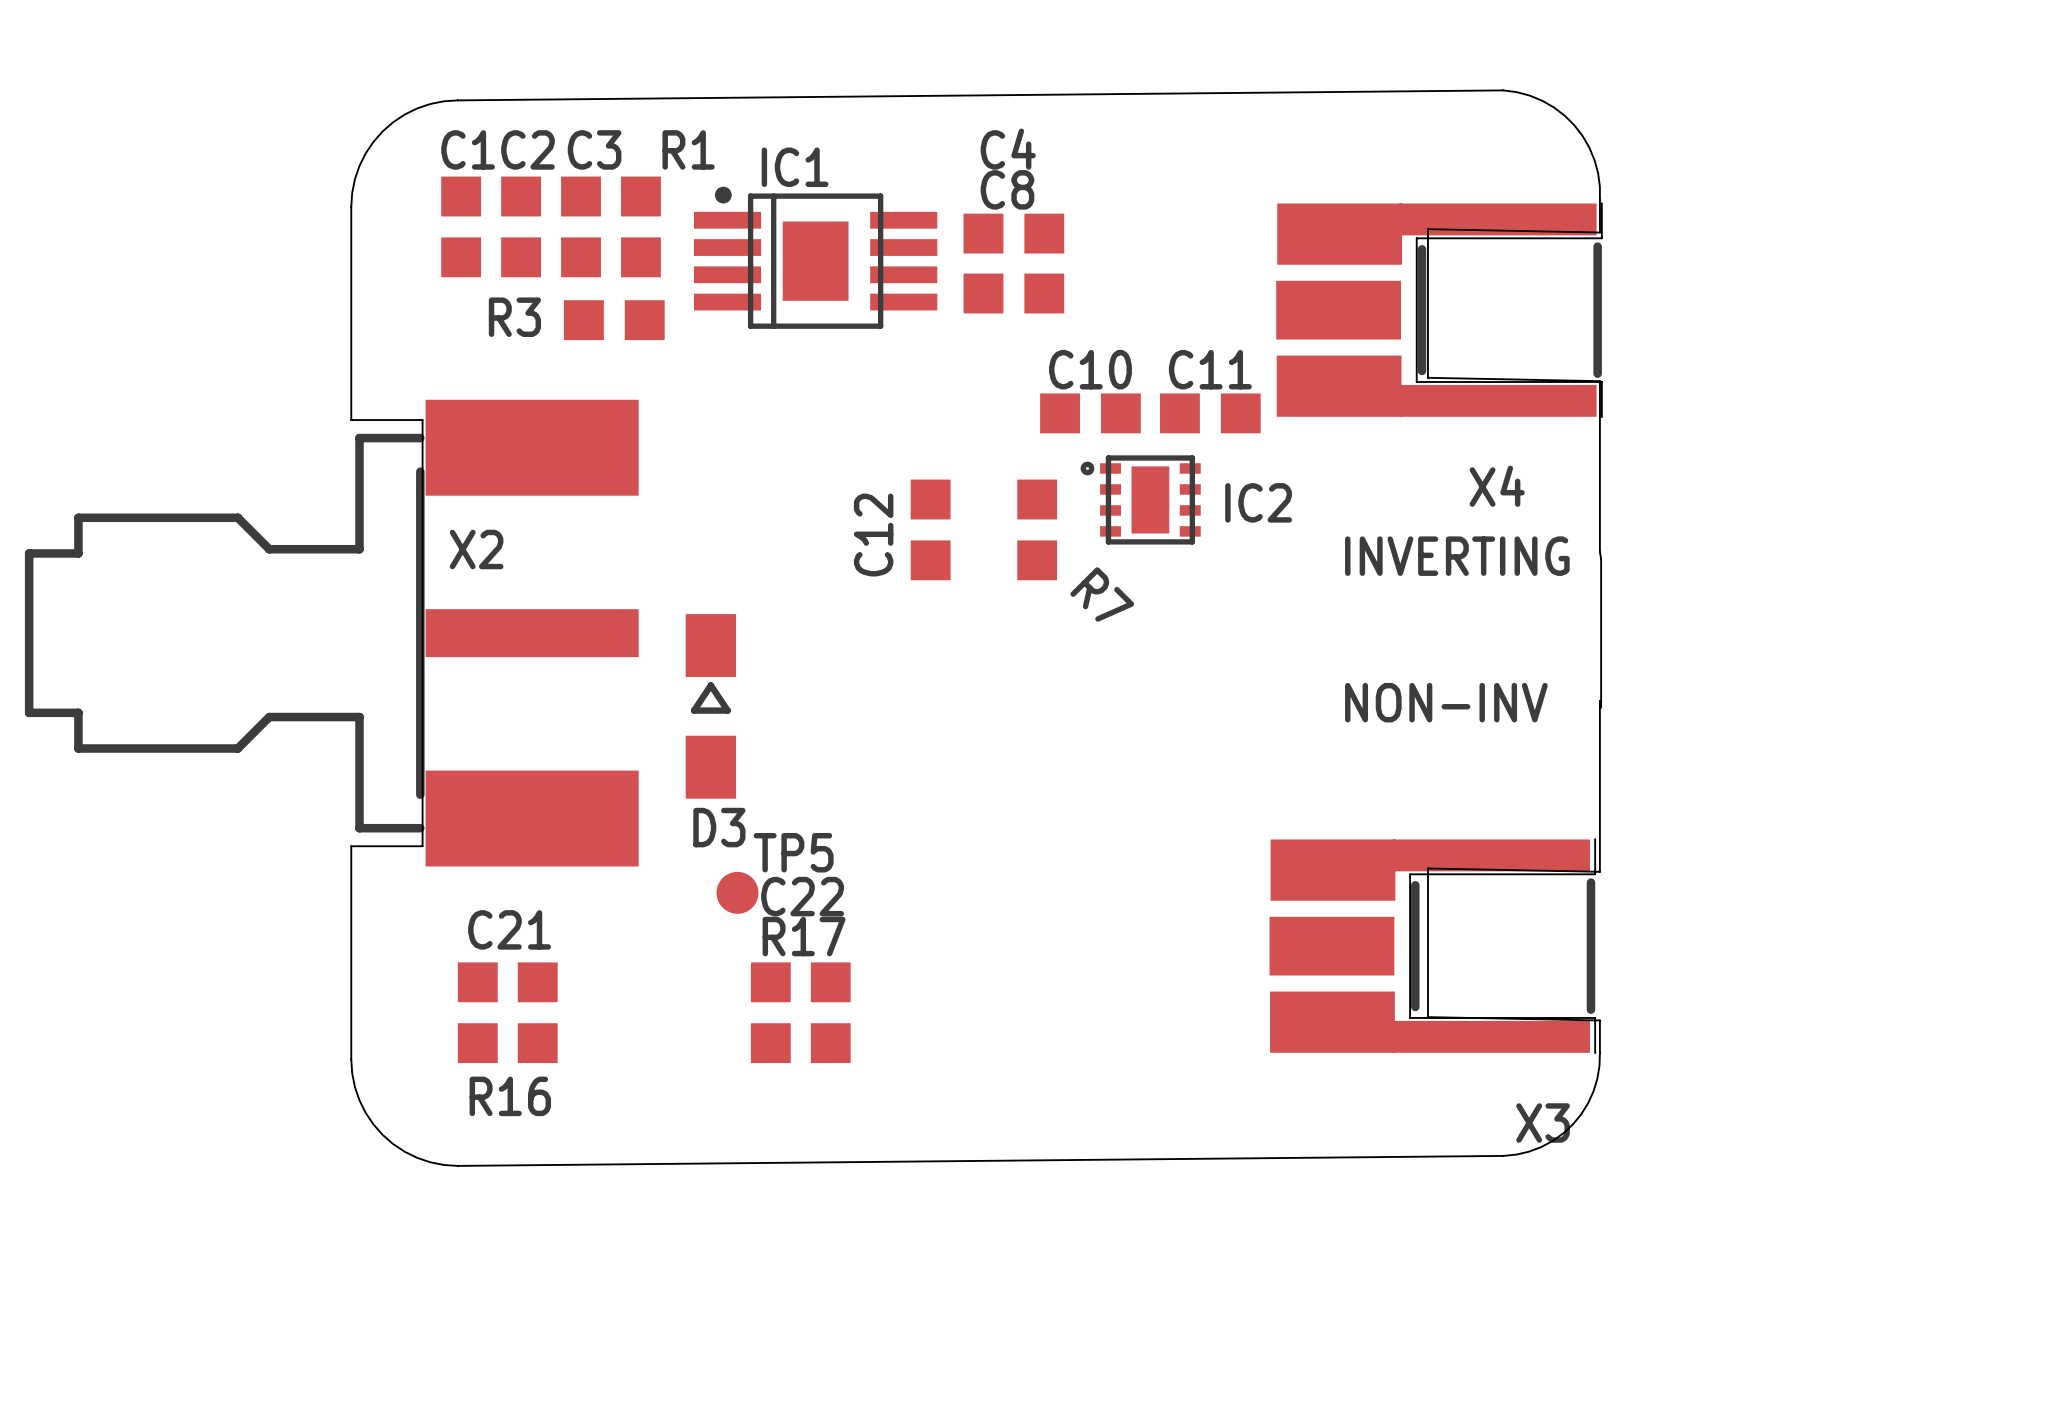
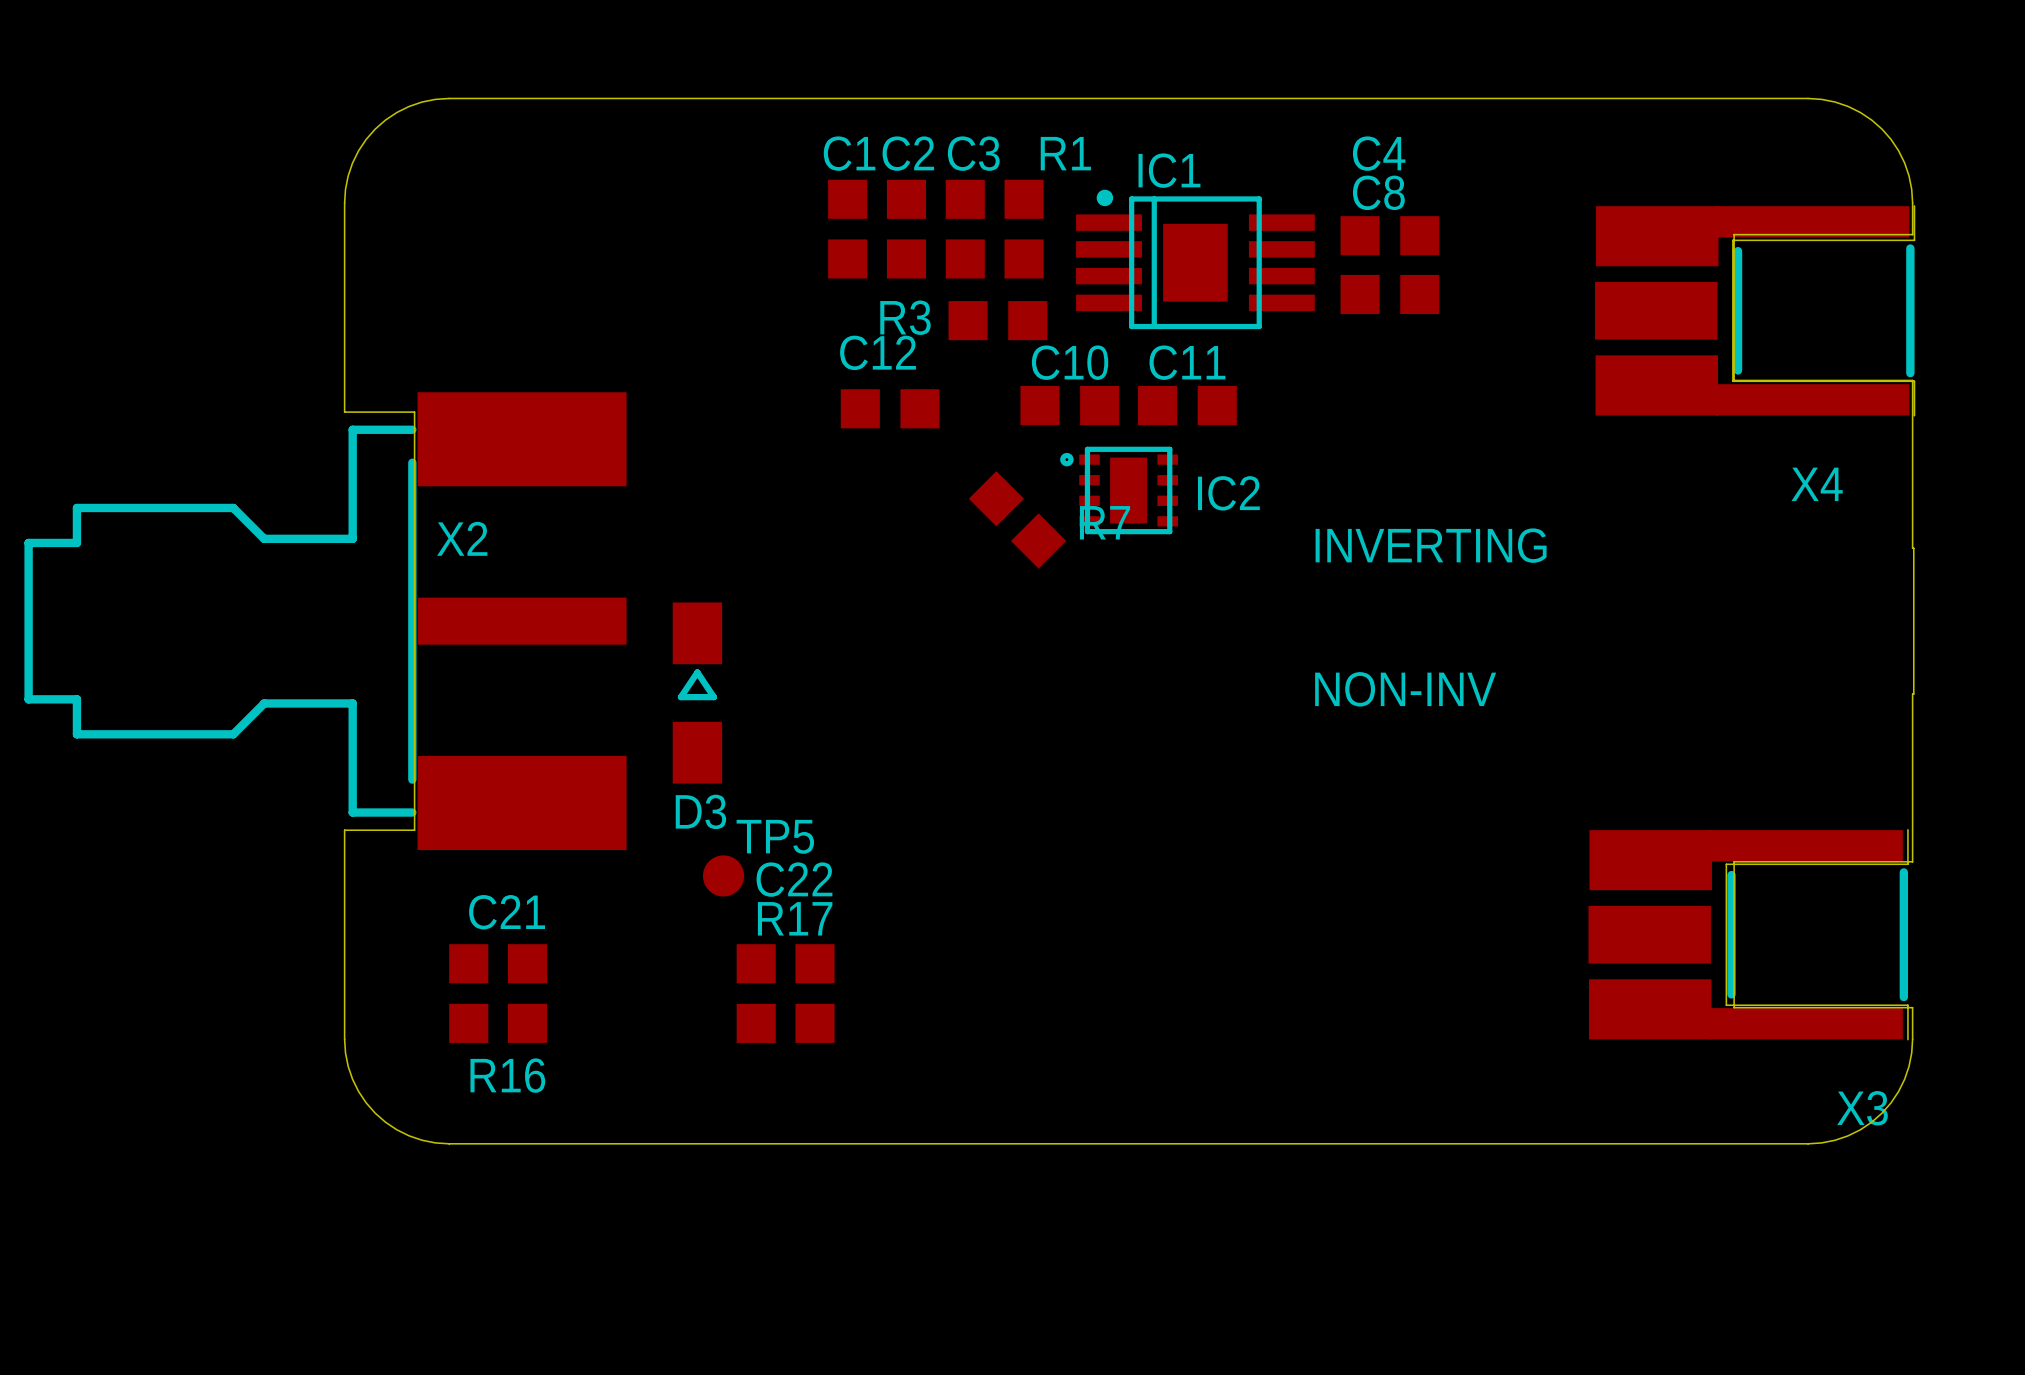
board edge: (457, 100) (1503, 90) (1529, 95) (1542, 100) (1564, 115) (1582, 136) (1589, 147) (1594, 160) (1599, 186) (1599, 232) (1427, 229) (1427, 377) (1599, 381) (1601, 558) (1599, 871) (1427, 868) (1427, 1017) (1599, 1020) (1599, 1065) (1597, 1078) (1588, 1103) (1581, 1114) (1563, 1133) (1541, 1147) (1529, 1151) (1503, 1155) (457, 1165) -> (449, 98) (1808, 98) (1835, 102) (1848, 106) (1871, 120) (1881, 129) (1898, 150) (1909, 175) (1911, 189) (1912, 234) (1734, 234) (1734, 380) (1912, 380) (1913, 548) (1912, 861) (1734, 861) (1734, 1007) (1912, 1007) (1911, 1052) (1909, 1066) (1898, 1091) (1881, 1113) (1871, 1122) (1848, 1135) (1835, 1140) (1808, 1143) (449, 1143)
C1 position: (461, 226) -> (847, 229)
C2 position: (521, 226) -> (906, 229)
C3 position: (581, 226) -> (965, 229)
R1 position: (640, 226) -> (1024, 229)
C4 position: (1013, 233) -> (1389, 235)
IC1 position: (815, 257) -> (1195, 259)
C8 position: (1013, 293) -> (1389, 294)
X4 position: (1439, 310) -> (1754, 310)
R3 position: (614, 320) -> (997, 320)
C12 rotation: 0° (930, 529) -> 90° clockwise (890, 408)
C12 position: (930, 529) -> (890, 408)
R7 rotation: 0° (1037, 529) -> 45° counterclockwise (1017, 519)
X3 position: (1432, 946) -> (1748, 934)

